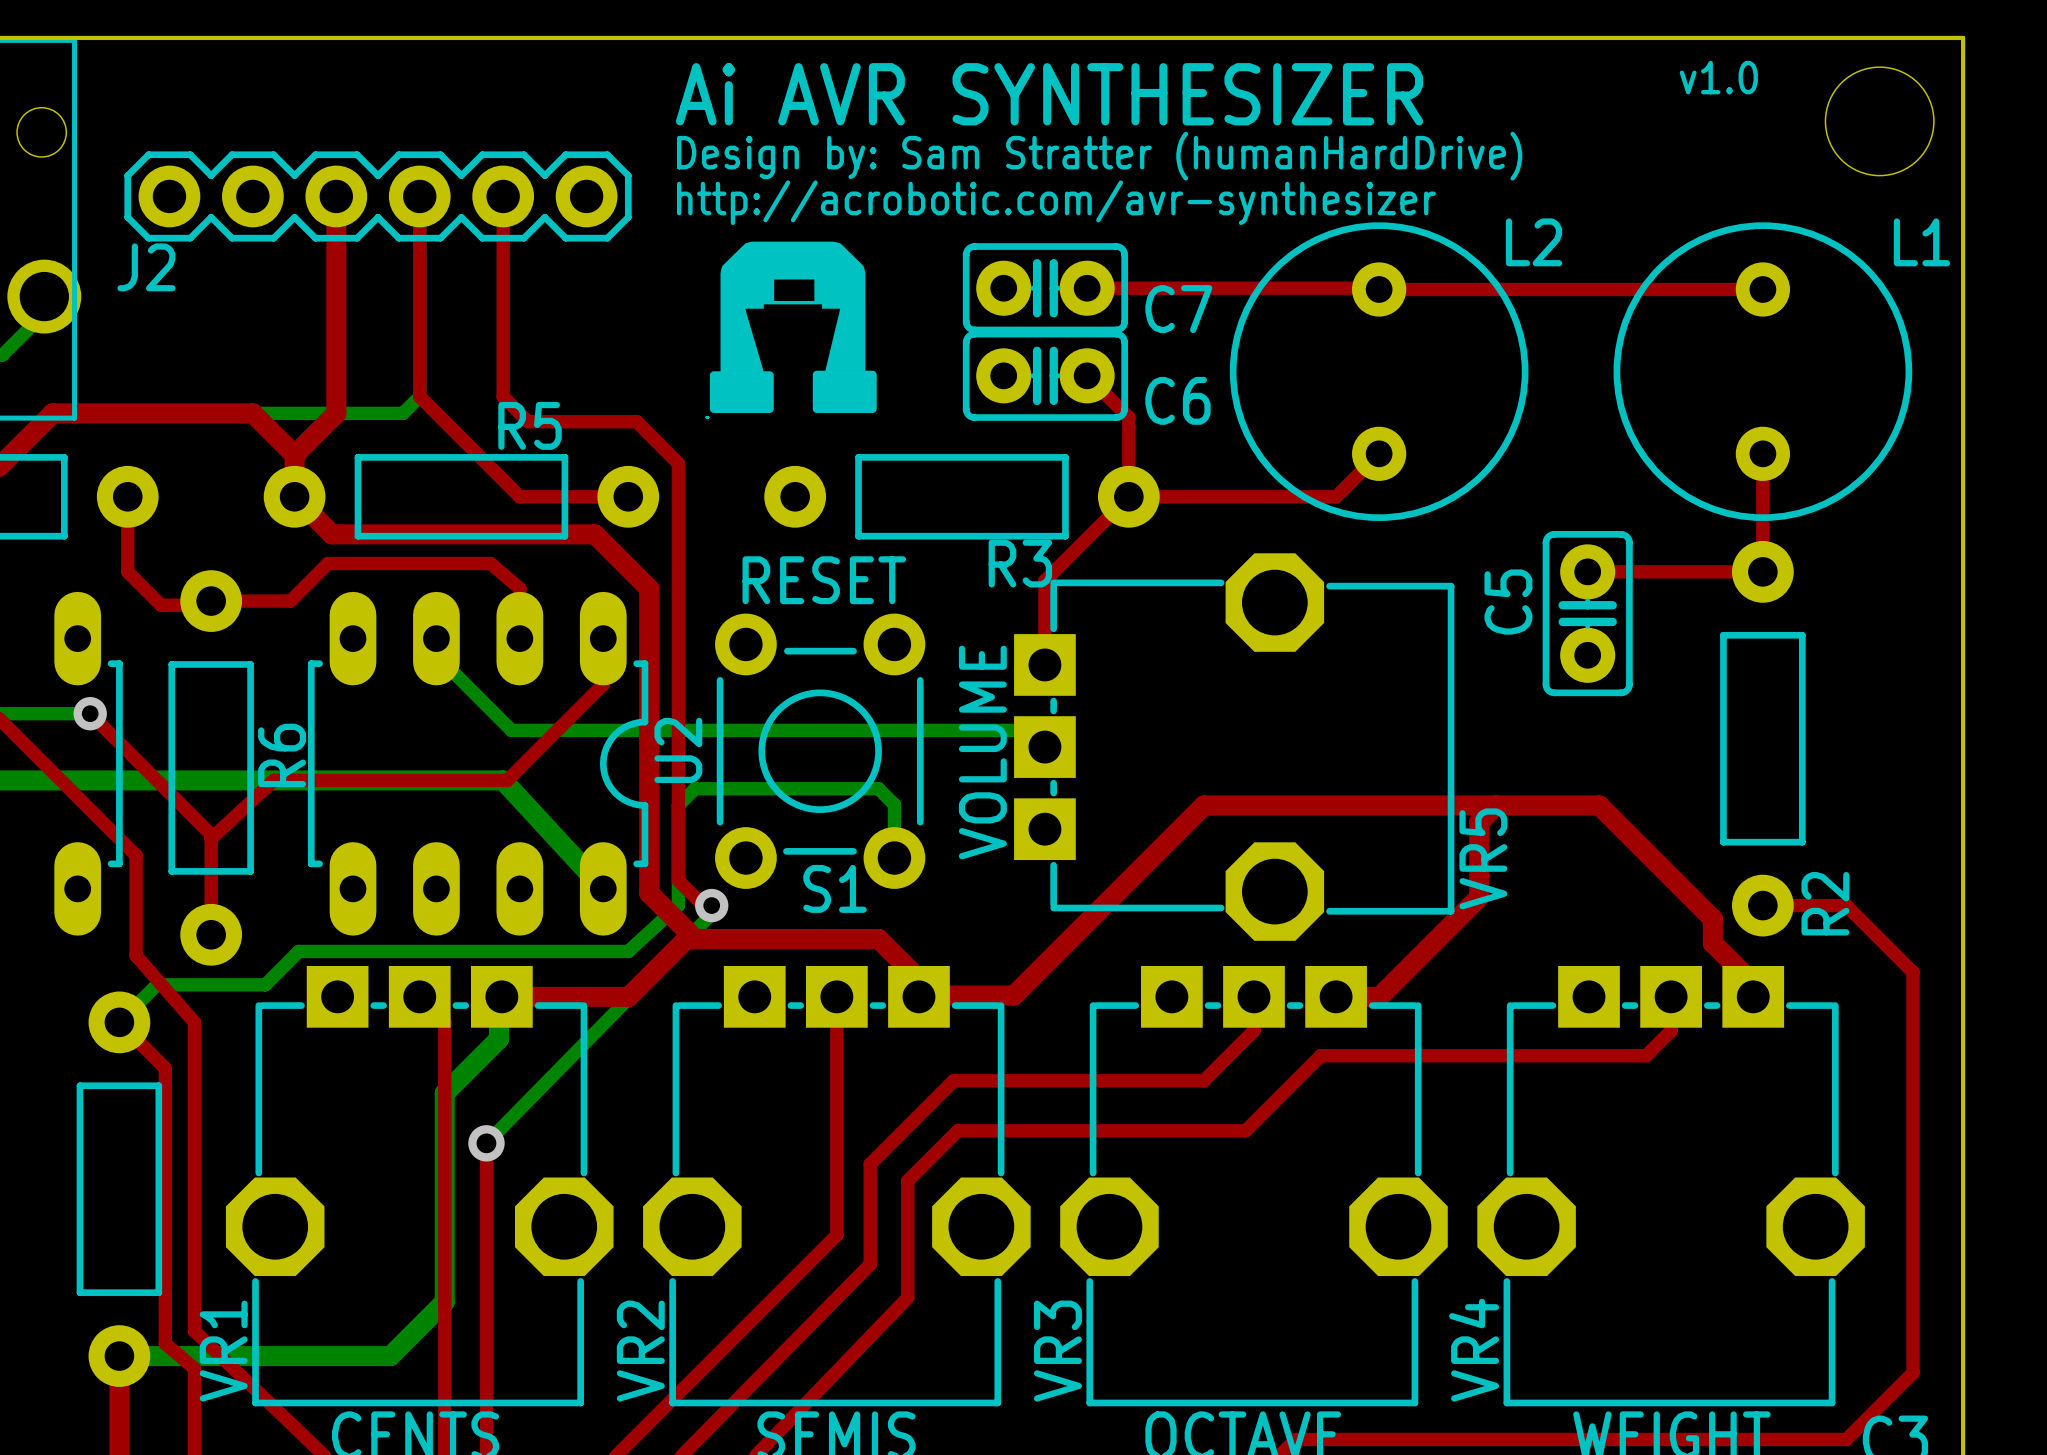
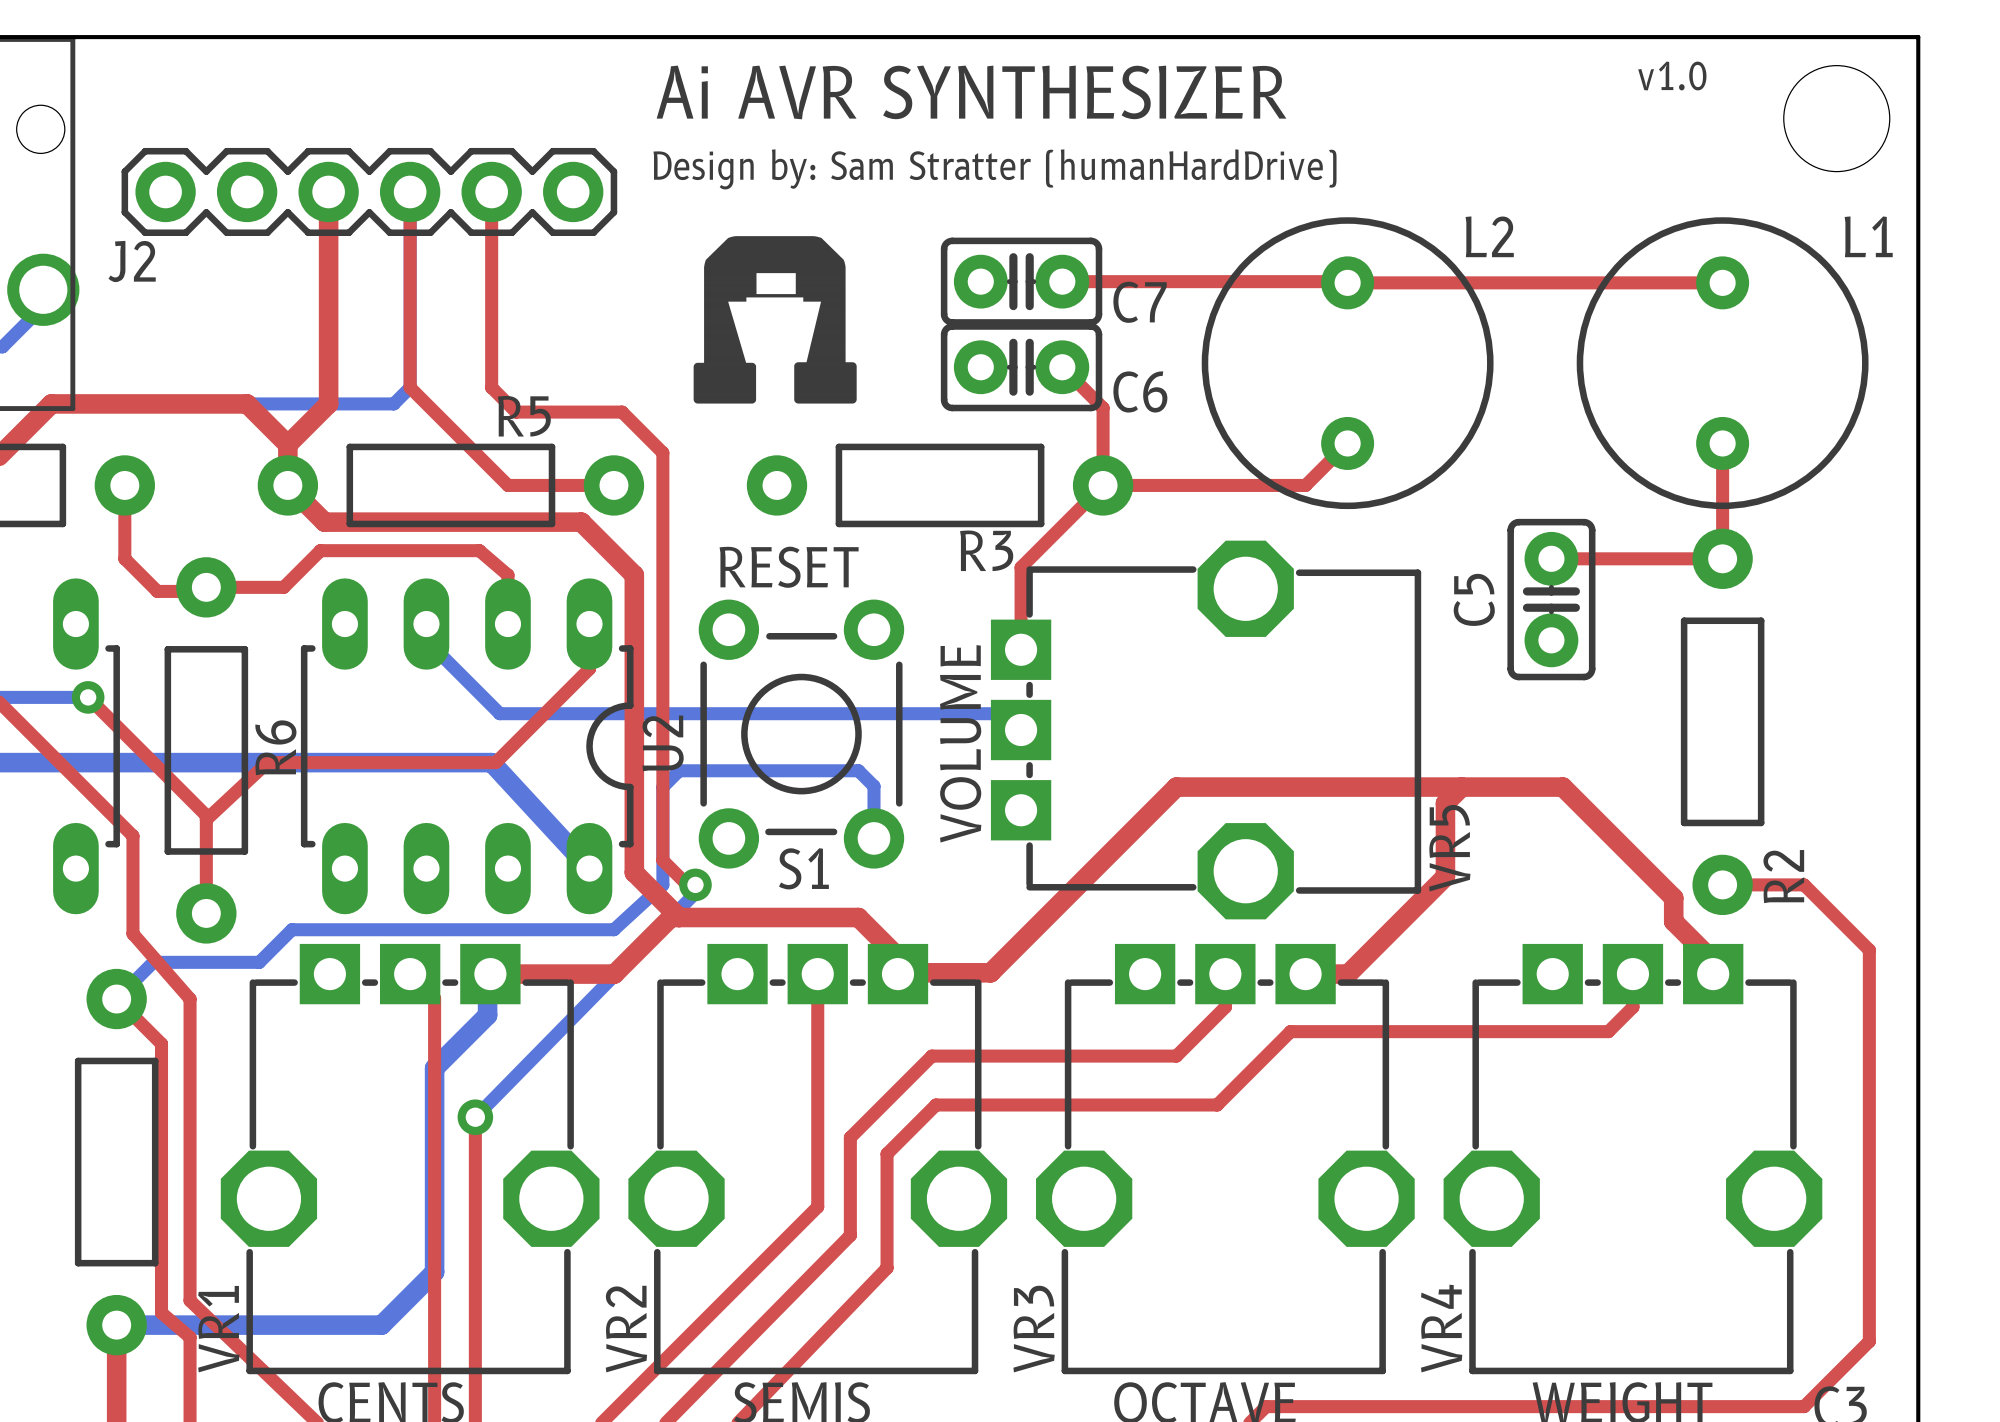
text position: Design by: Sam Stratter (humanHardDrive) (1099, 156) -> Design by: Sam Stratter (humanHardDrive) (995, 169)
text: http://acrobotic.com/avr-synthesizer (1056, 202) -> none

